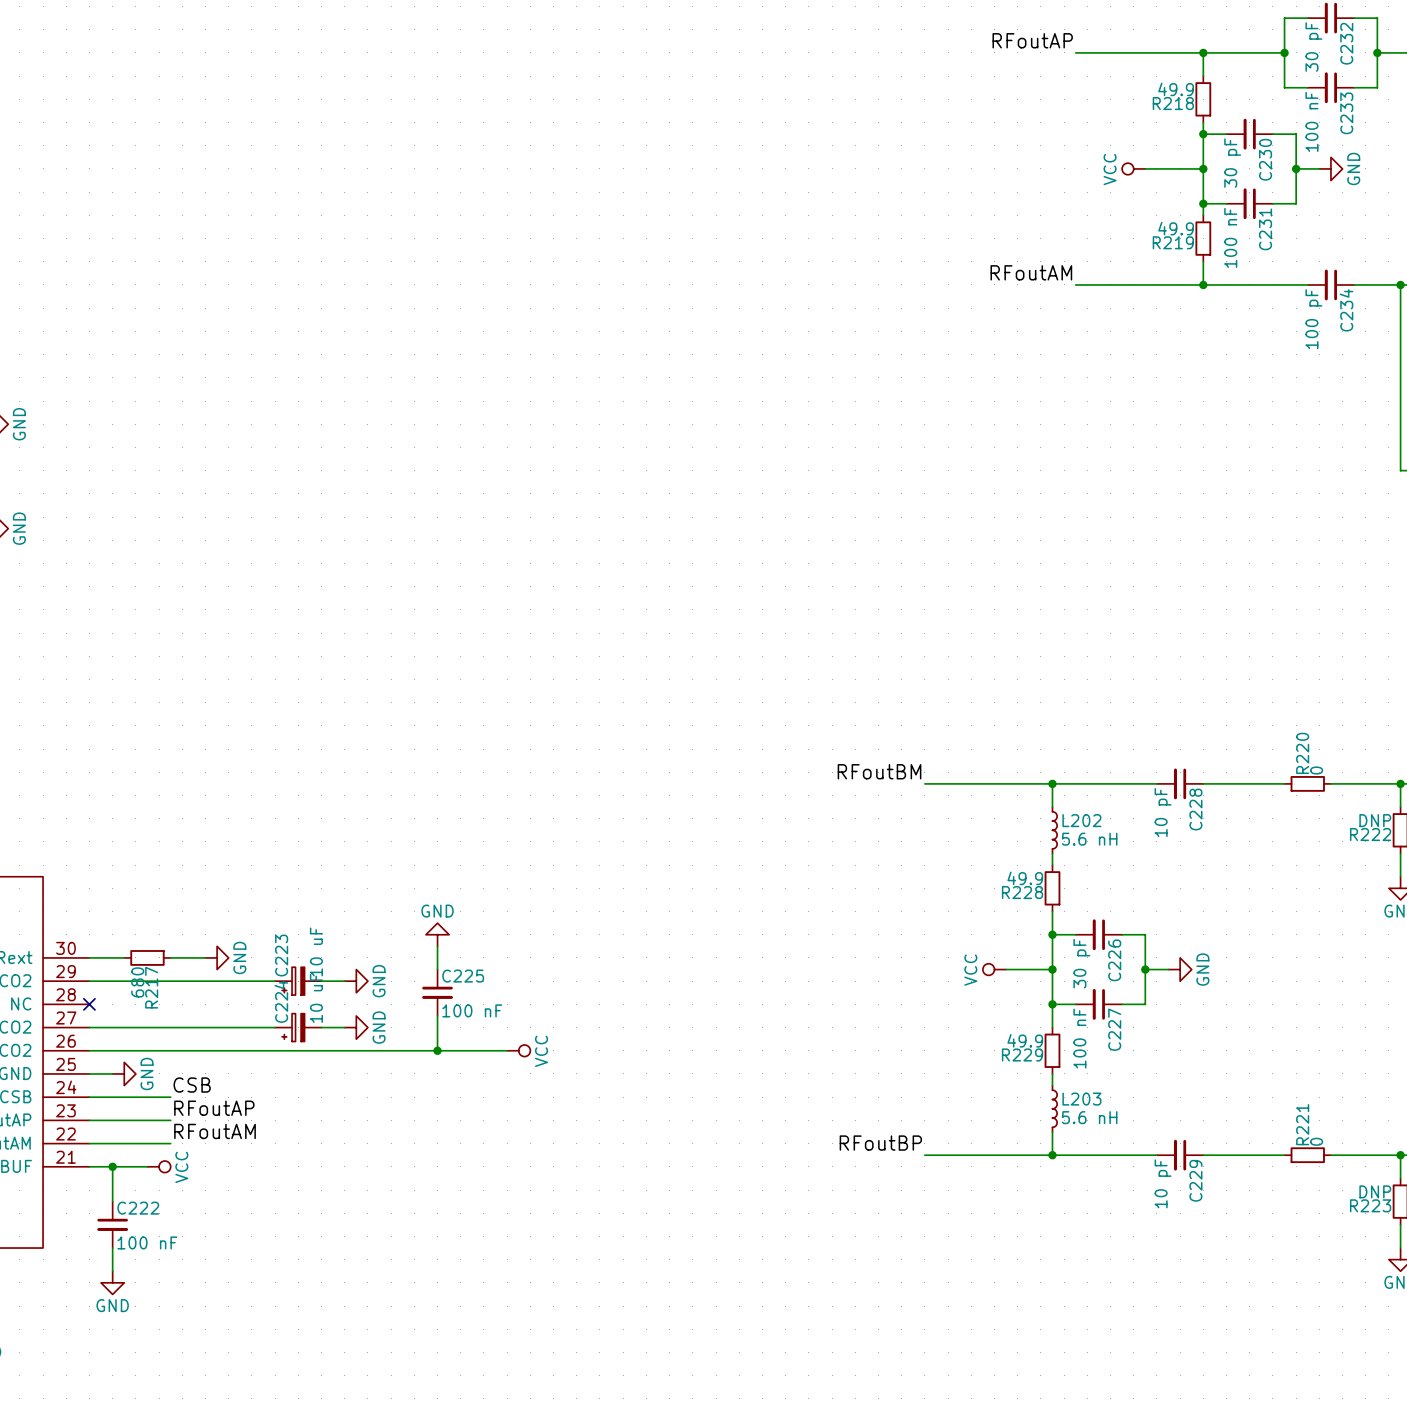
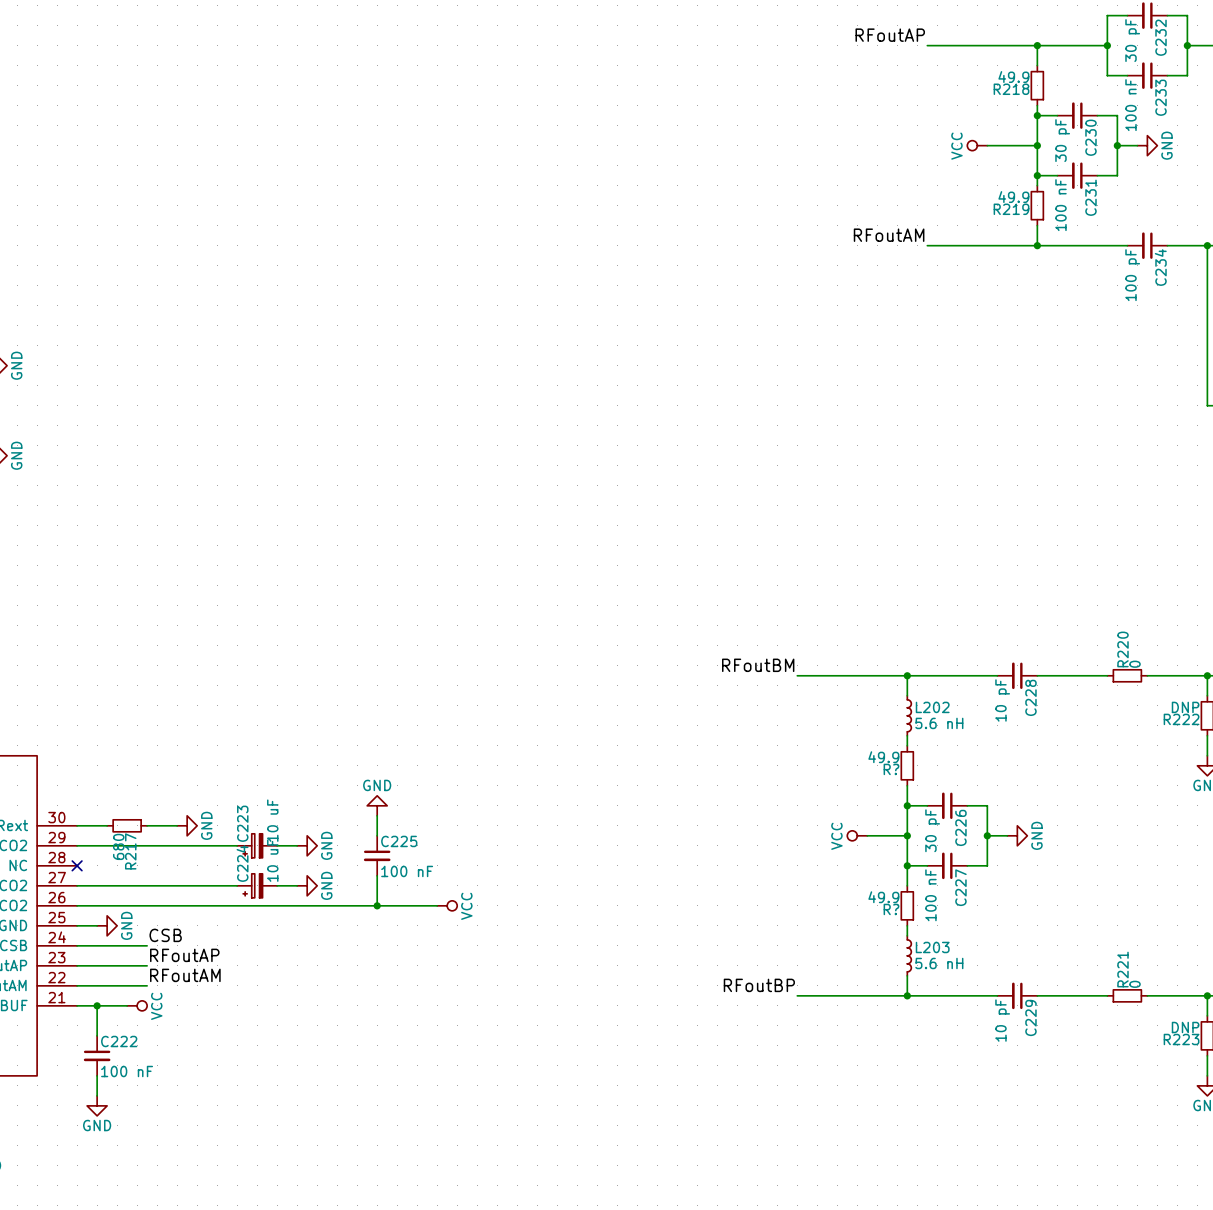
R228 name: R228 (1022, 892) -> R? (891, 769)
R229 name: R229 (1022, 1054) -> R? (891, 909)

